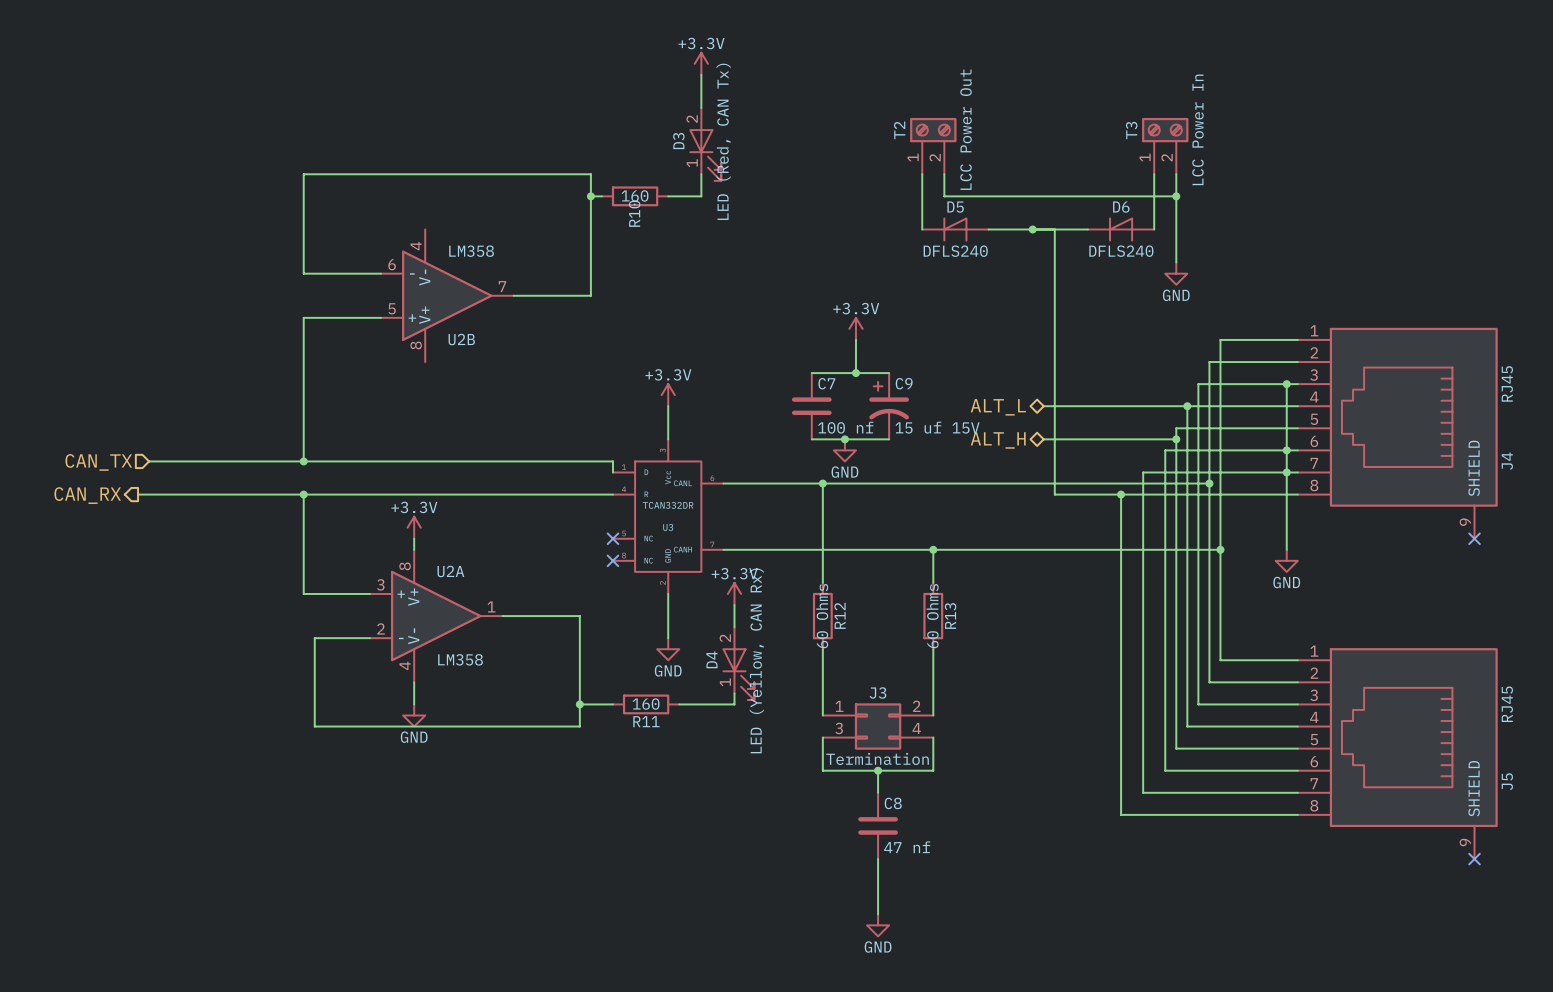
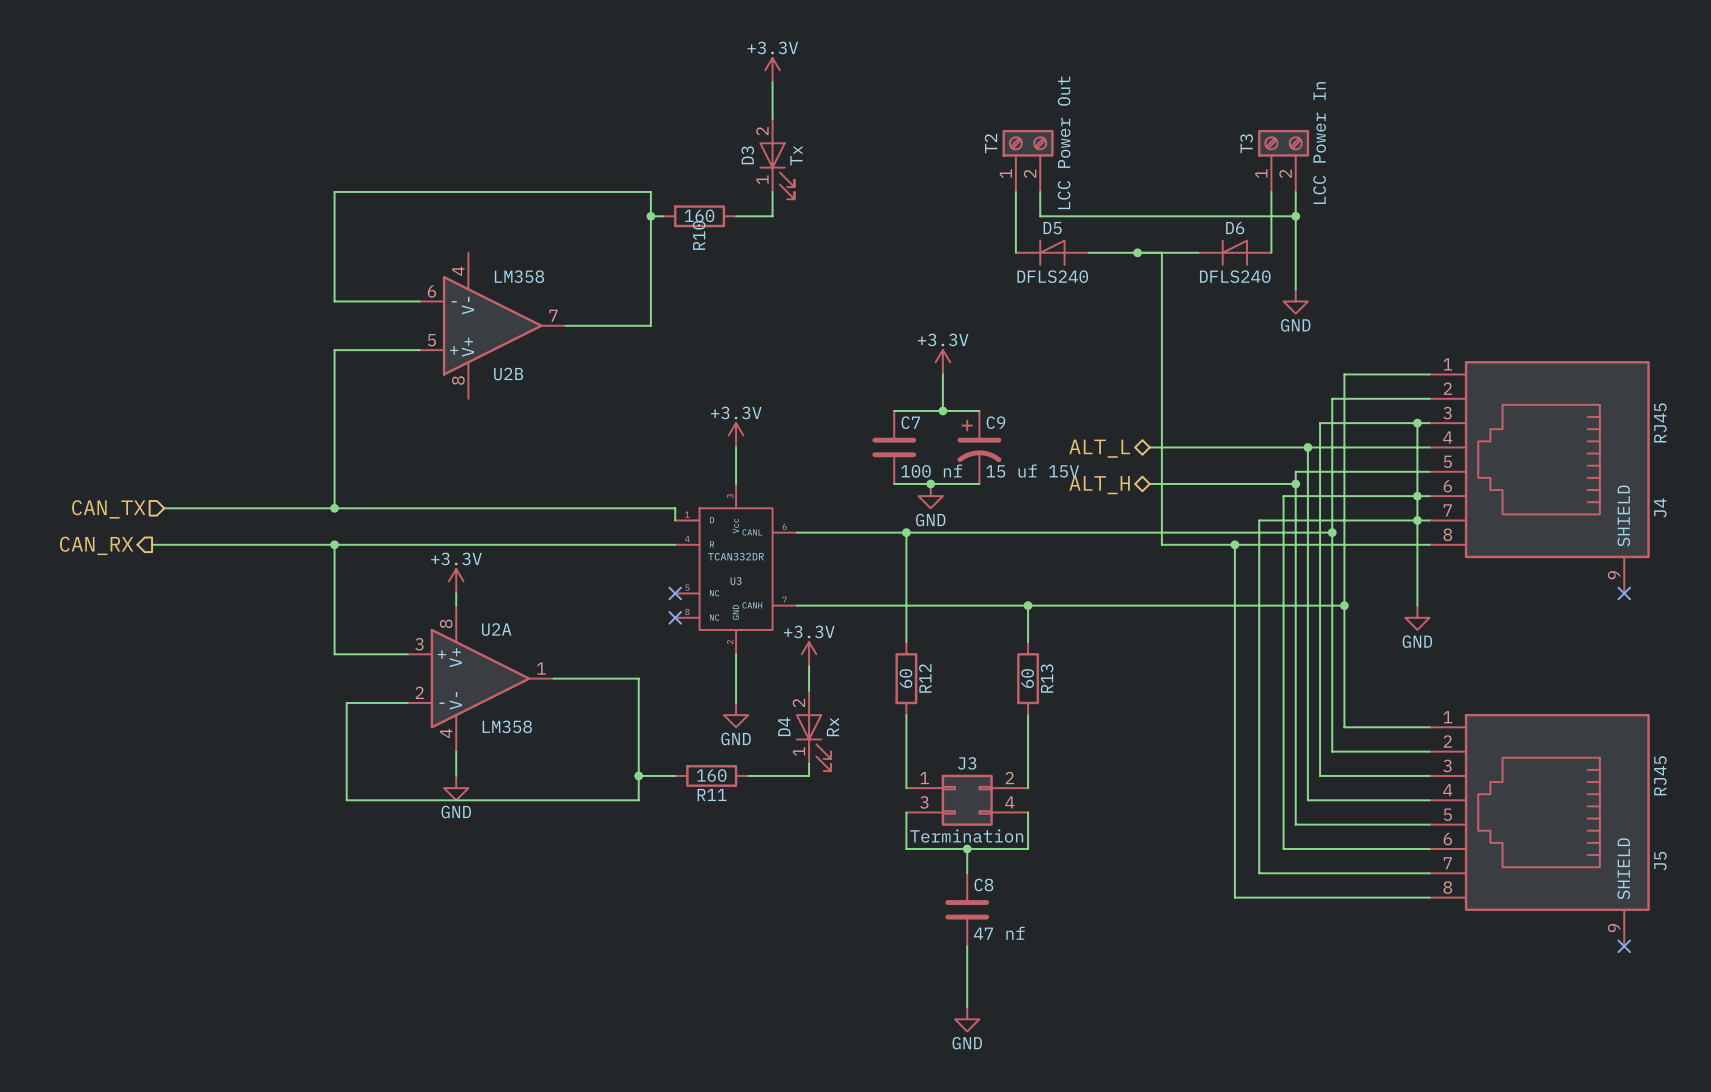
D3 value: LED (Red, CAN Tx) (723, 141) -> Tx (796, 155)
R12 value: 60 Ohms (822, 616) -> 60 (905, 678)
R13 value: 60 Ohms (932, 616) -> 60 (1027, 678)
D4 value: LED (Yellow, CAN Rx) (756, 660) -> Rx (832, 727)

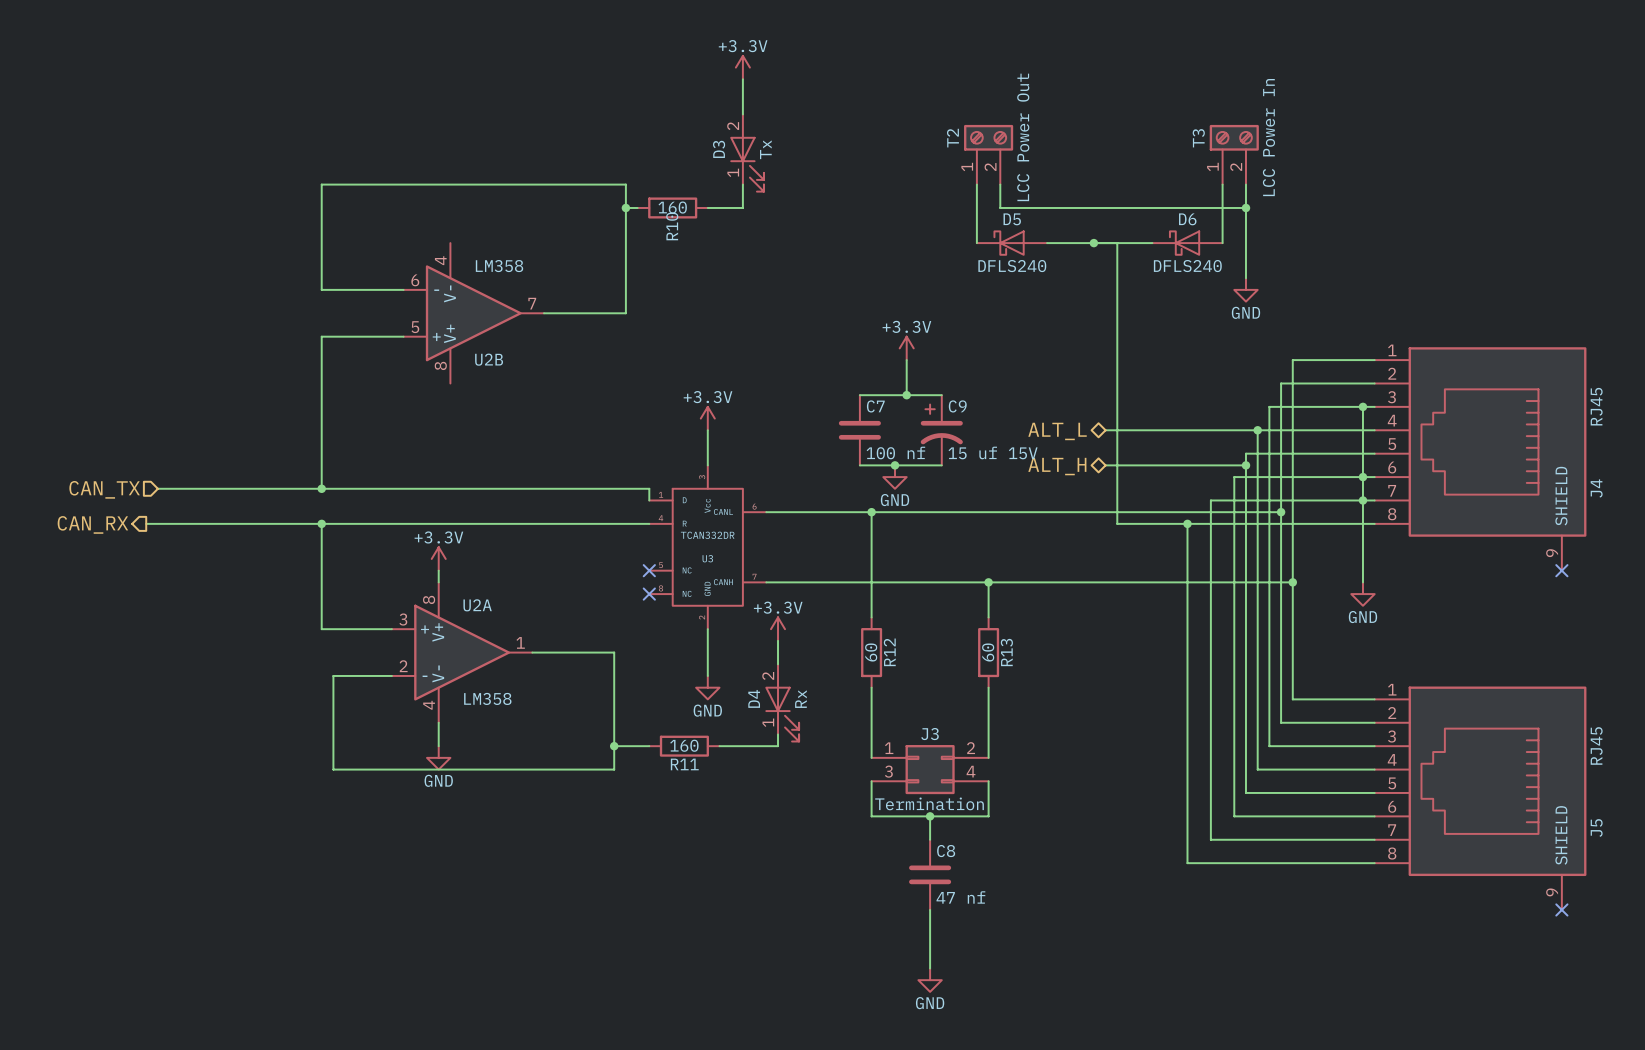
D5 symbol: [1015, 239, 1089, 266] -> [976, 230, 1048, 256]
D6 symbol: [1198, 239, 1272, 266] -> [1152, 230, 1223, 256]

